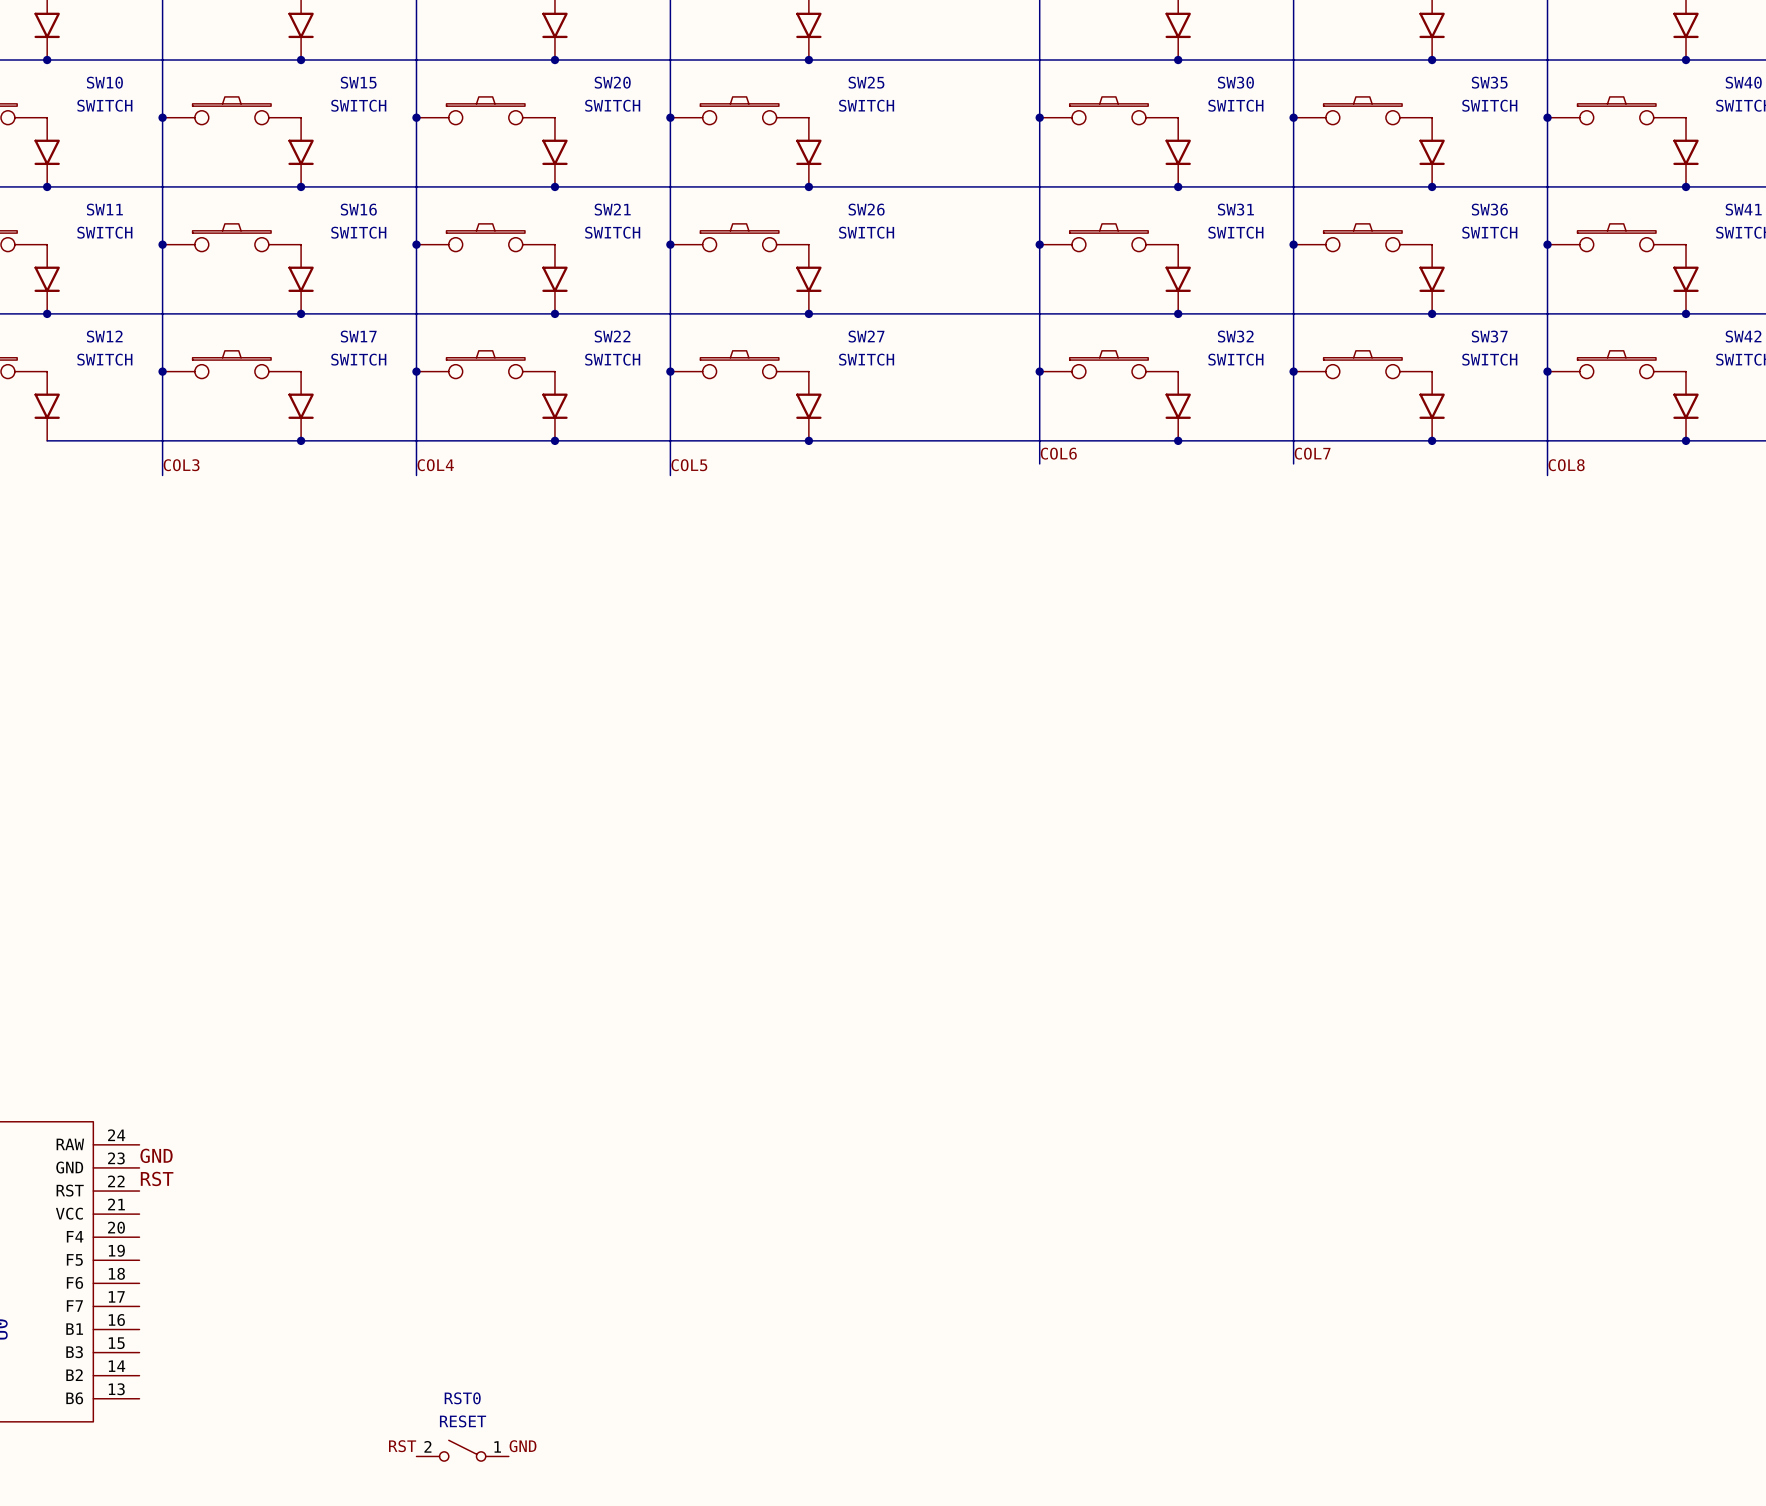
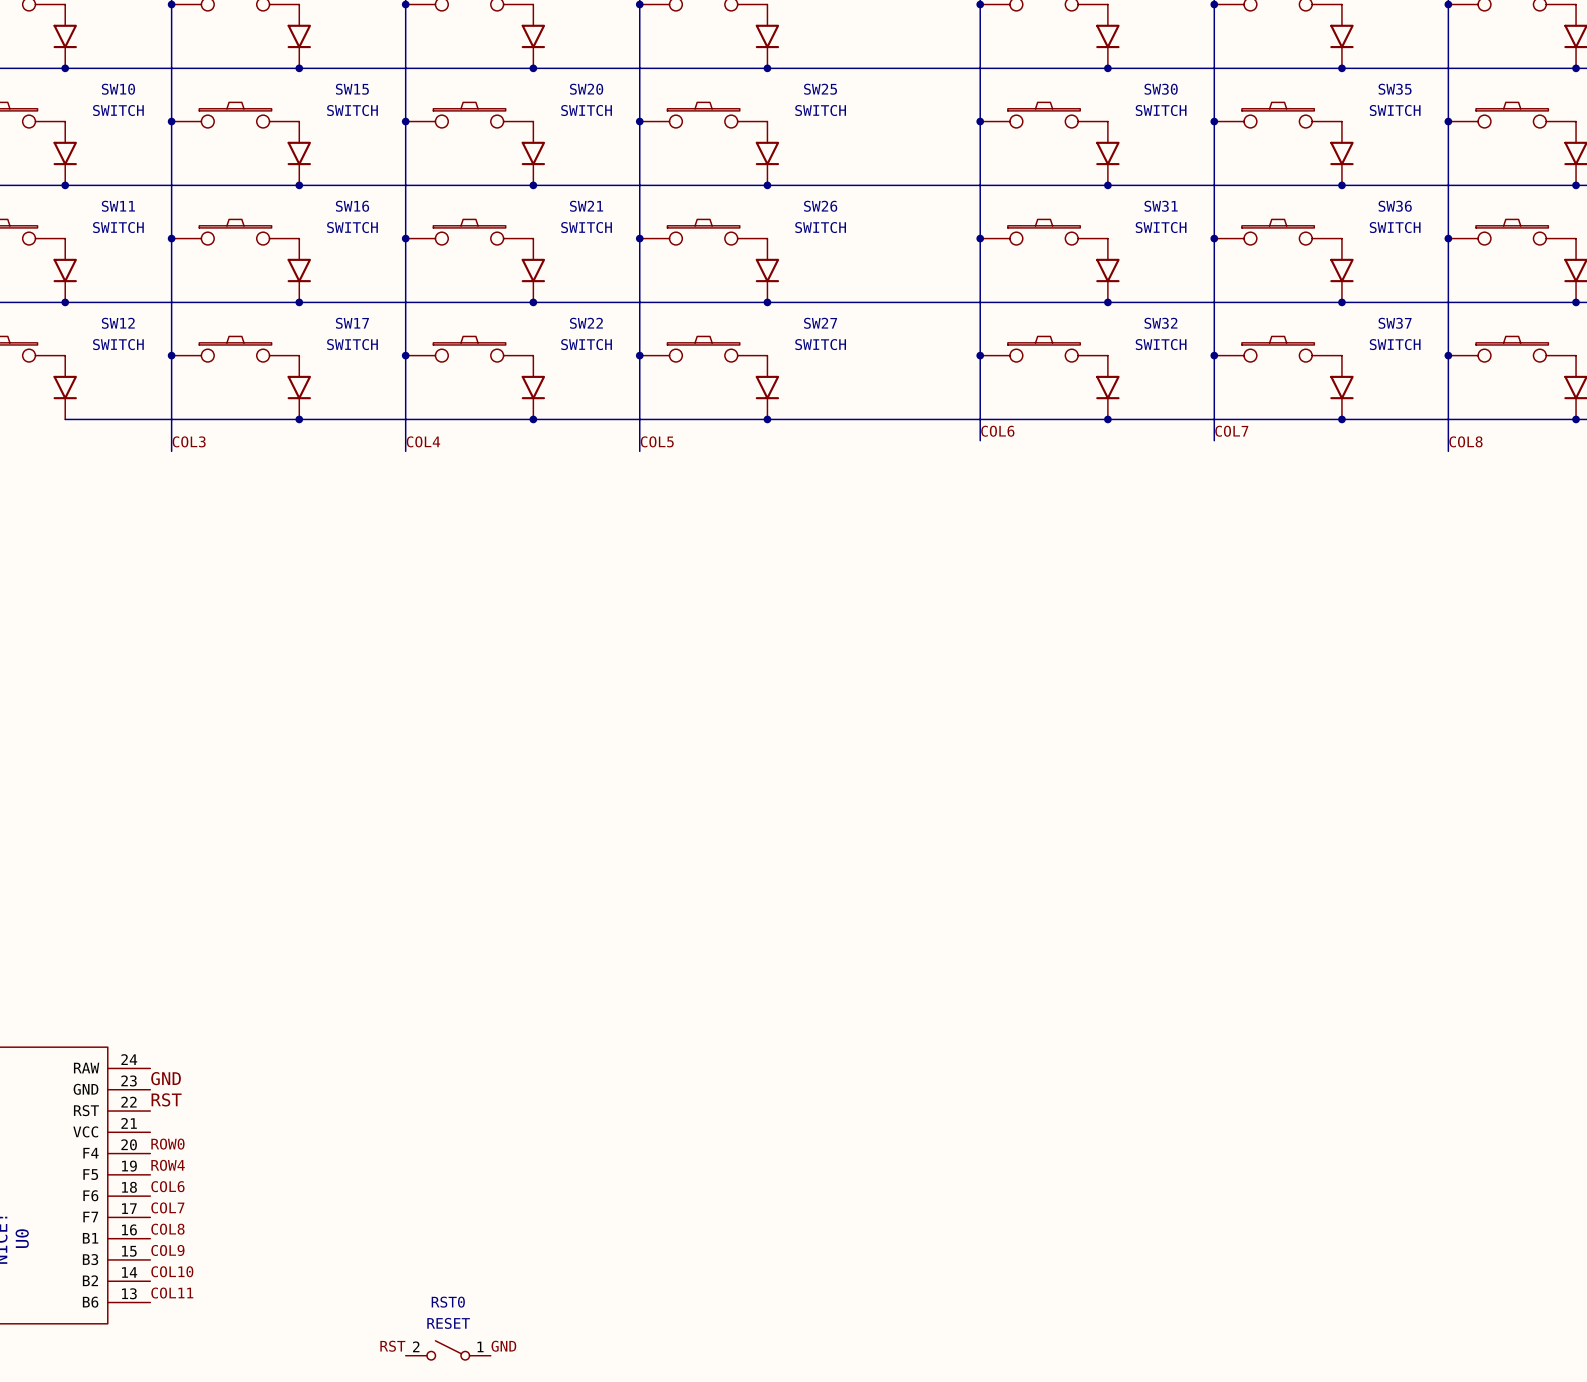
label: none -> ROW0 (167, 1144)
label: none -> ROW4 (168, 1165)
label: none -> COL6 (167, 1186)
label: none -> COL7 (167, 1207)
label: none -> COL8 (167, 1229)
label: none -> COL9 (167, 1250)
label: none -> COL10 (172, 1271)
label: none -> COL11 (172, 1293)

